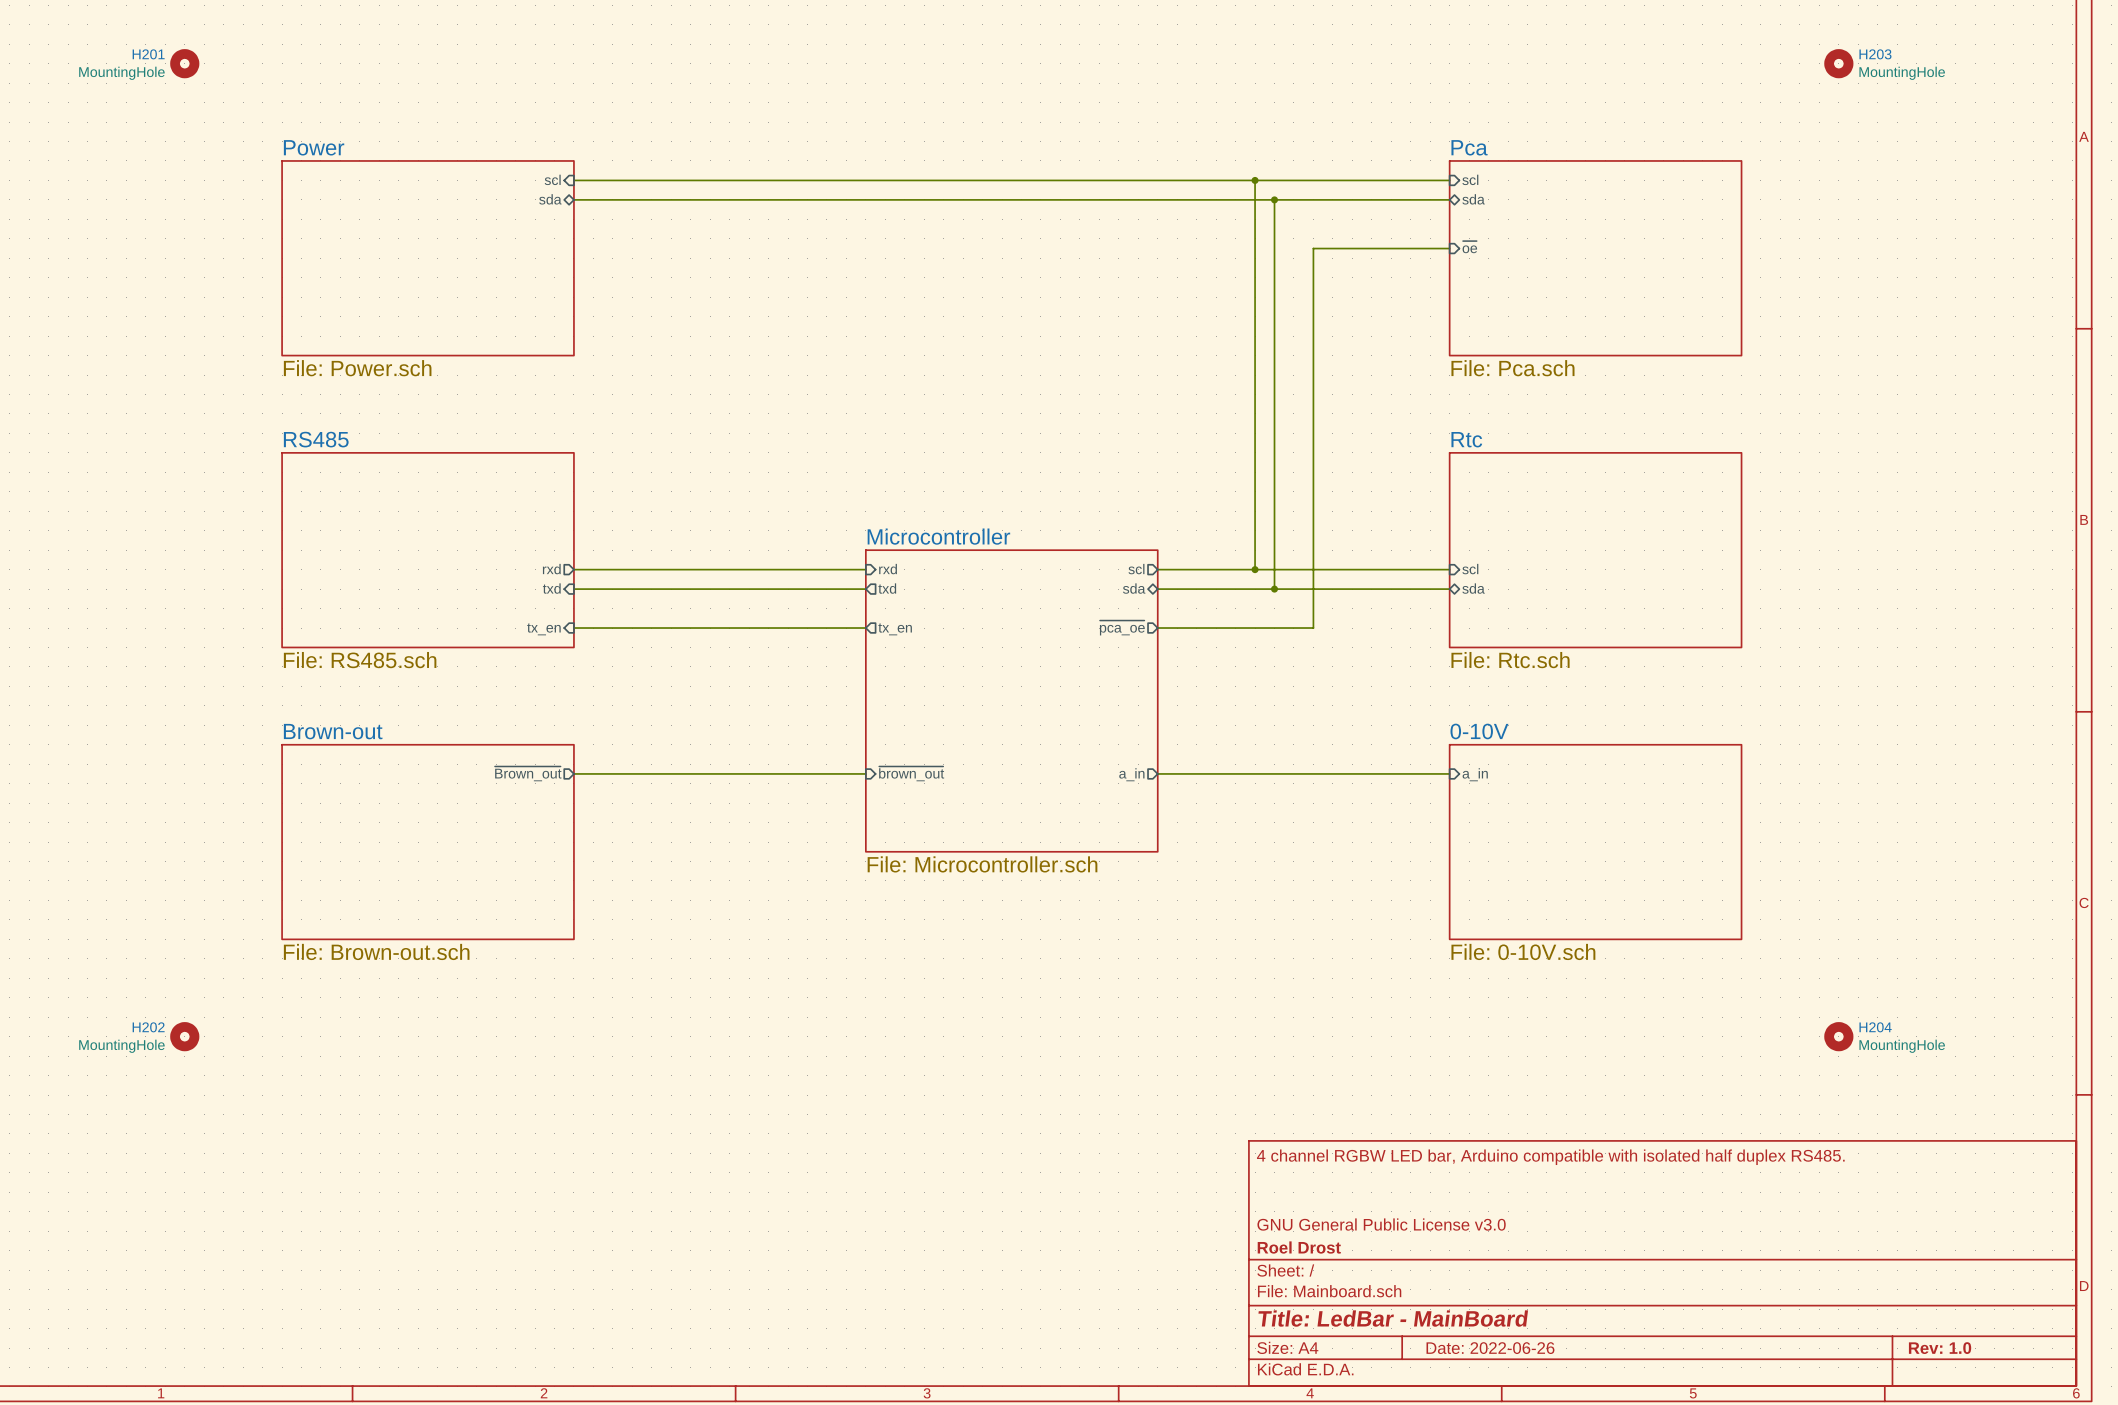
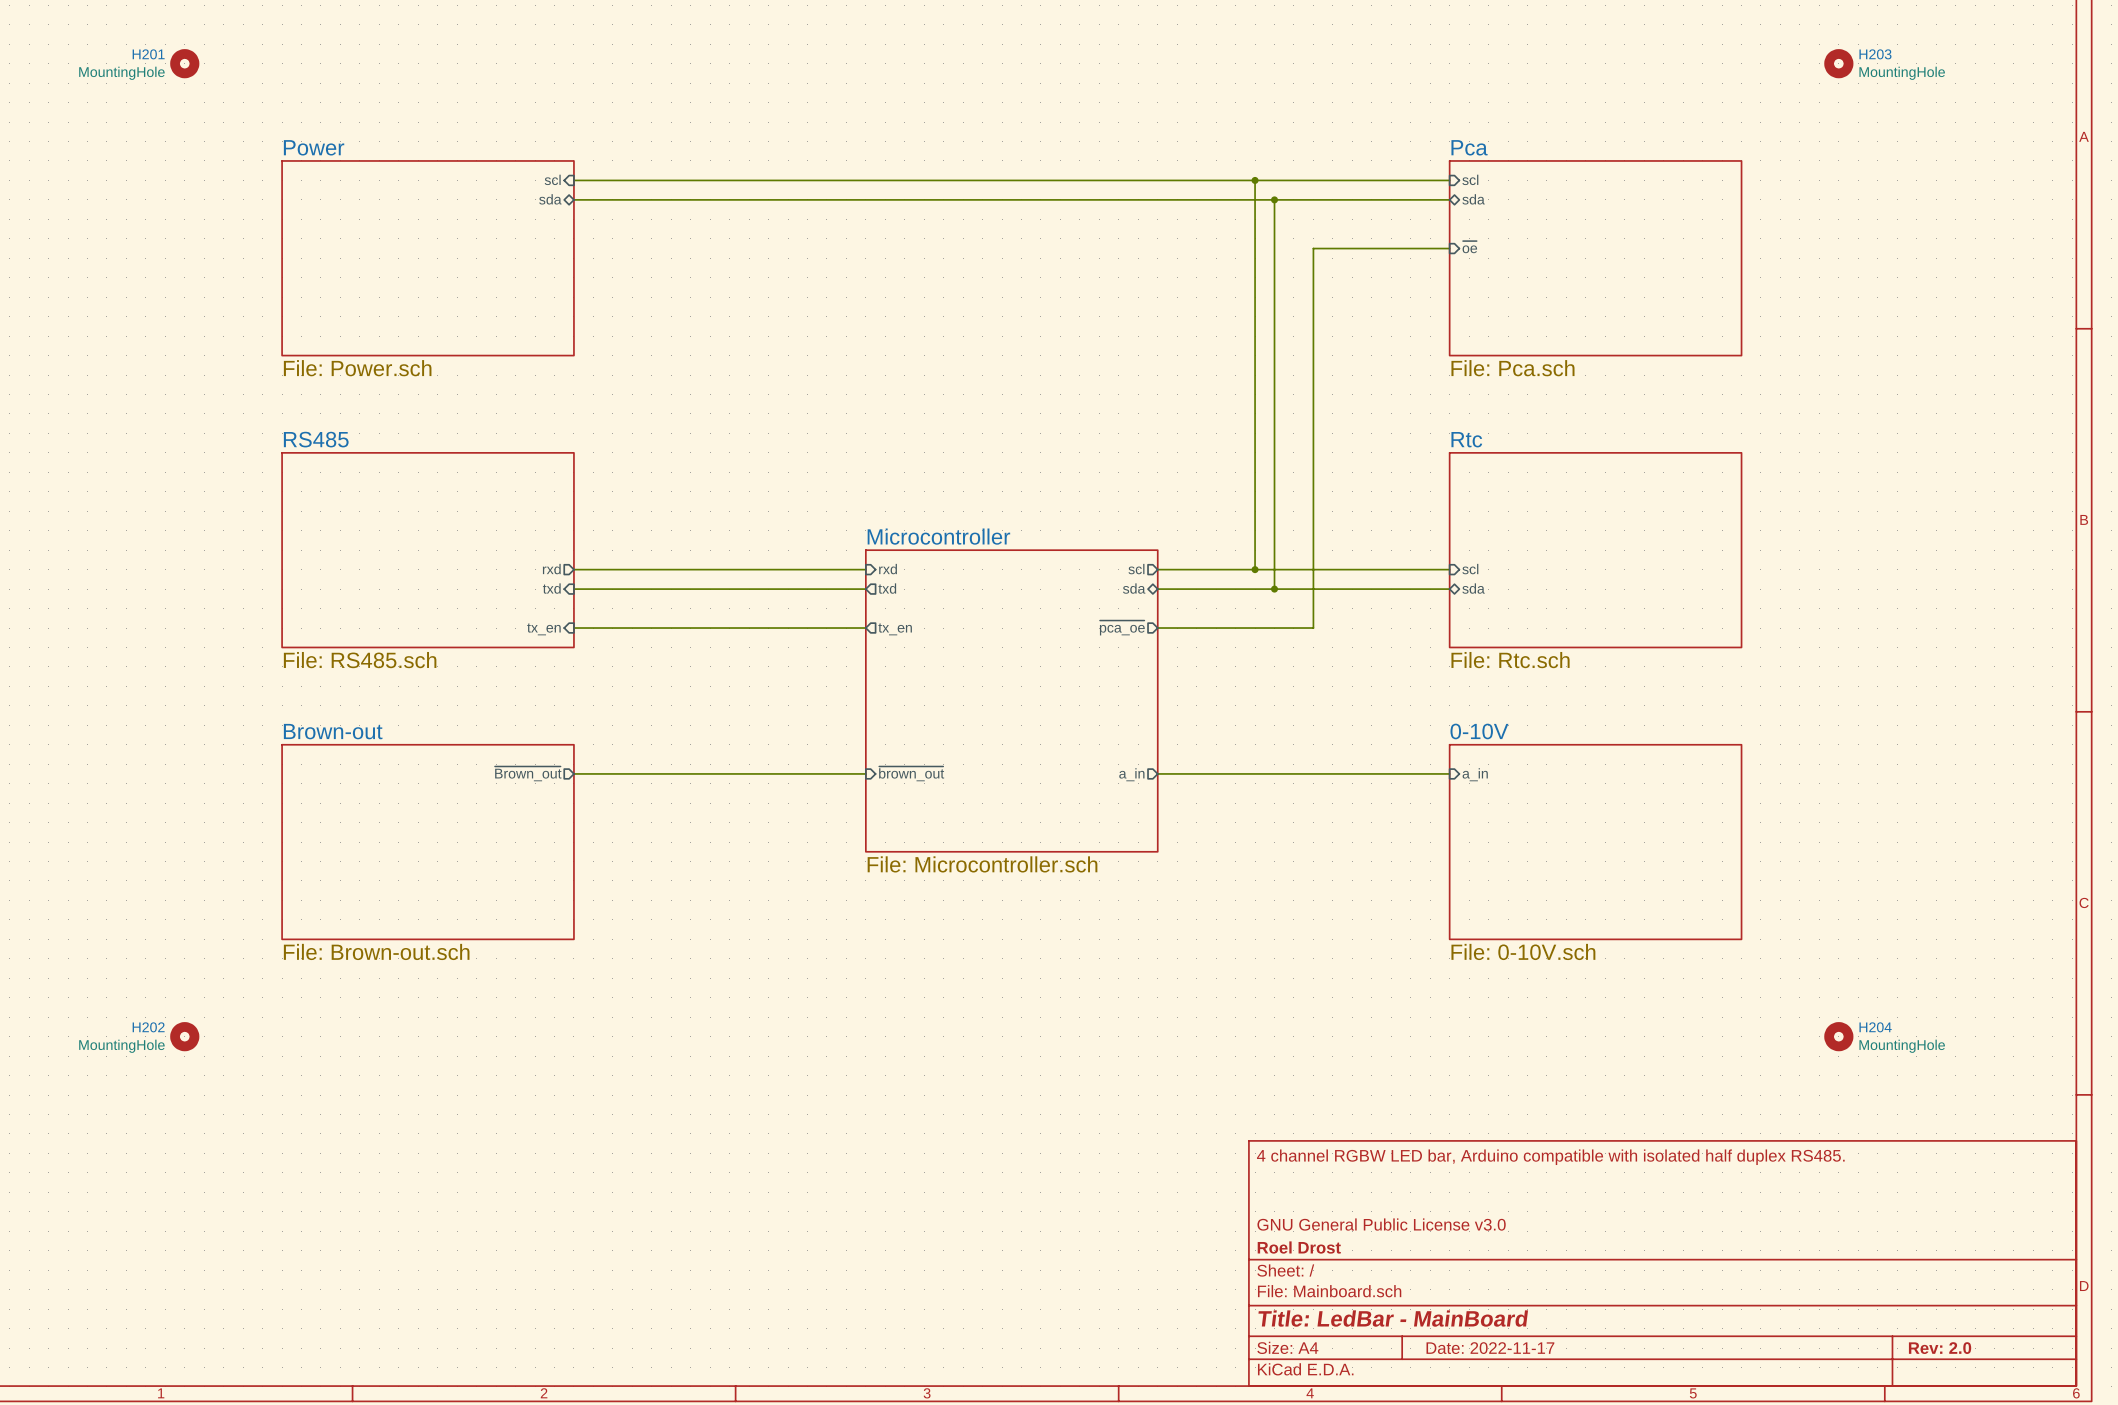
title block: Date: 2022-06-26 (1490, 1348) -> Date: 2022-11-17 (1490, 1348)
title block: Rev: 1.0 (1940, 1348) -> Rev: 2.0 (1940, 1348)

